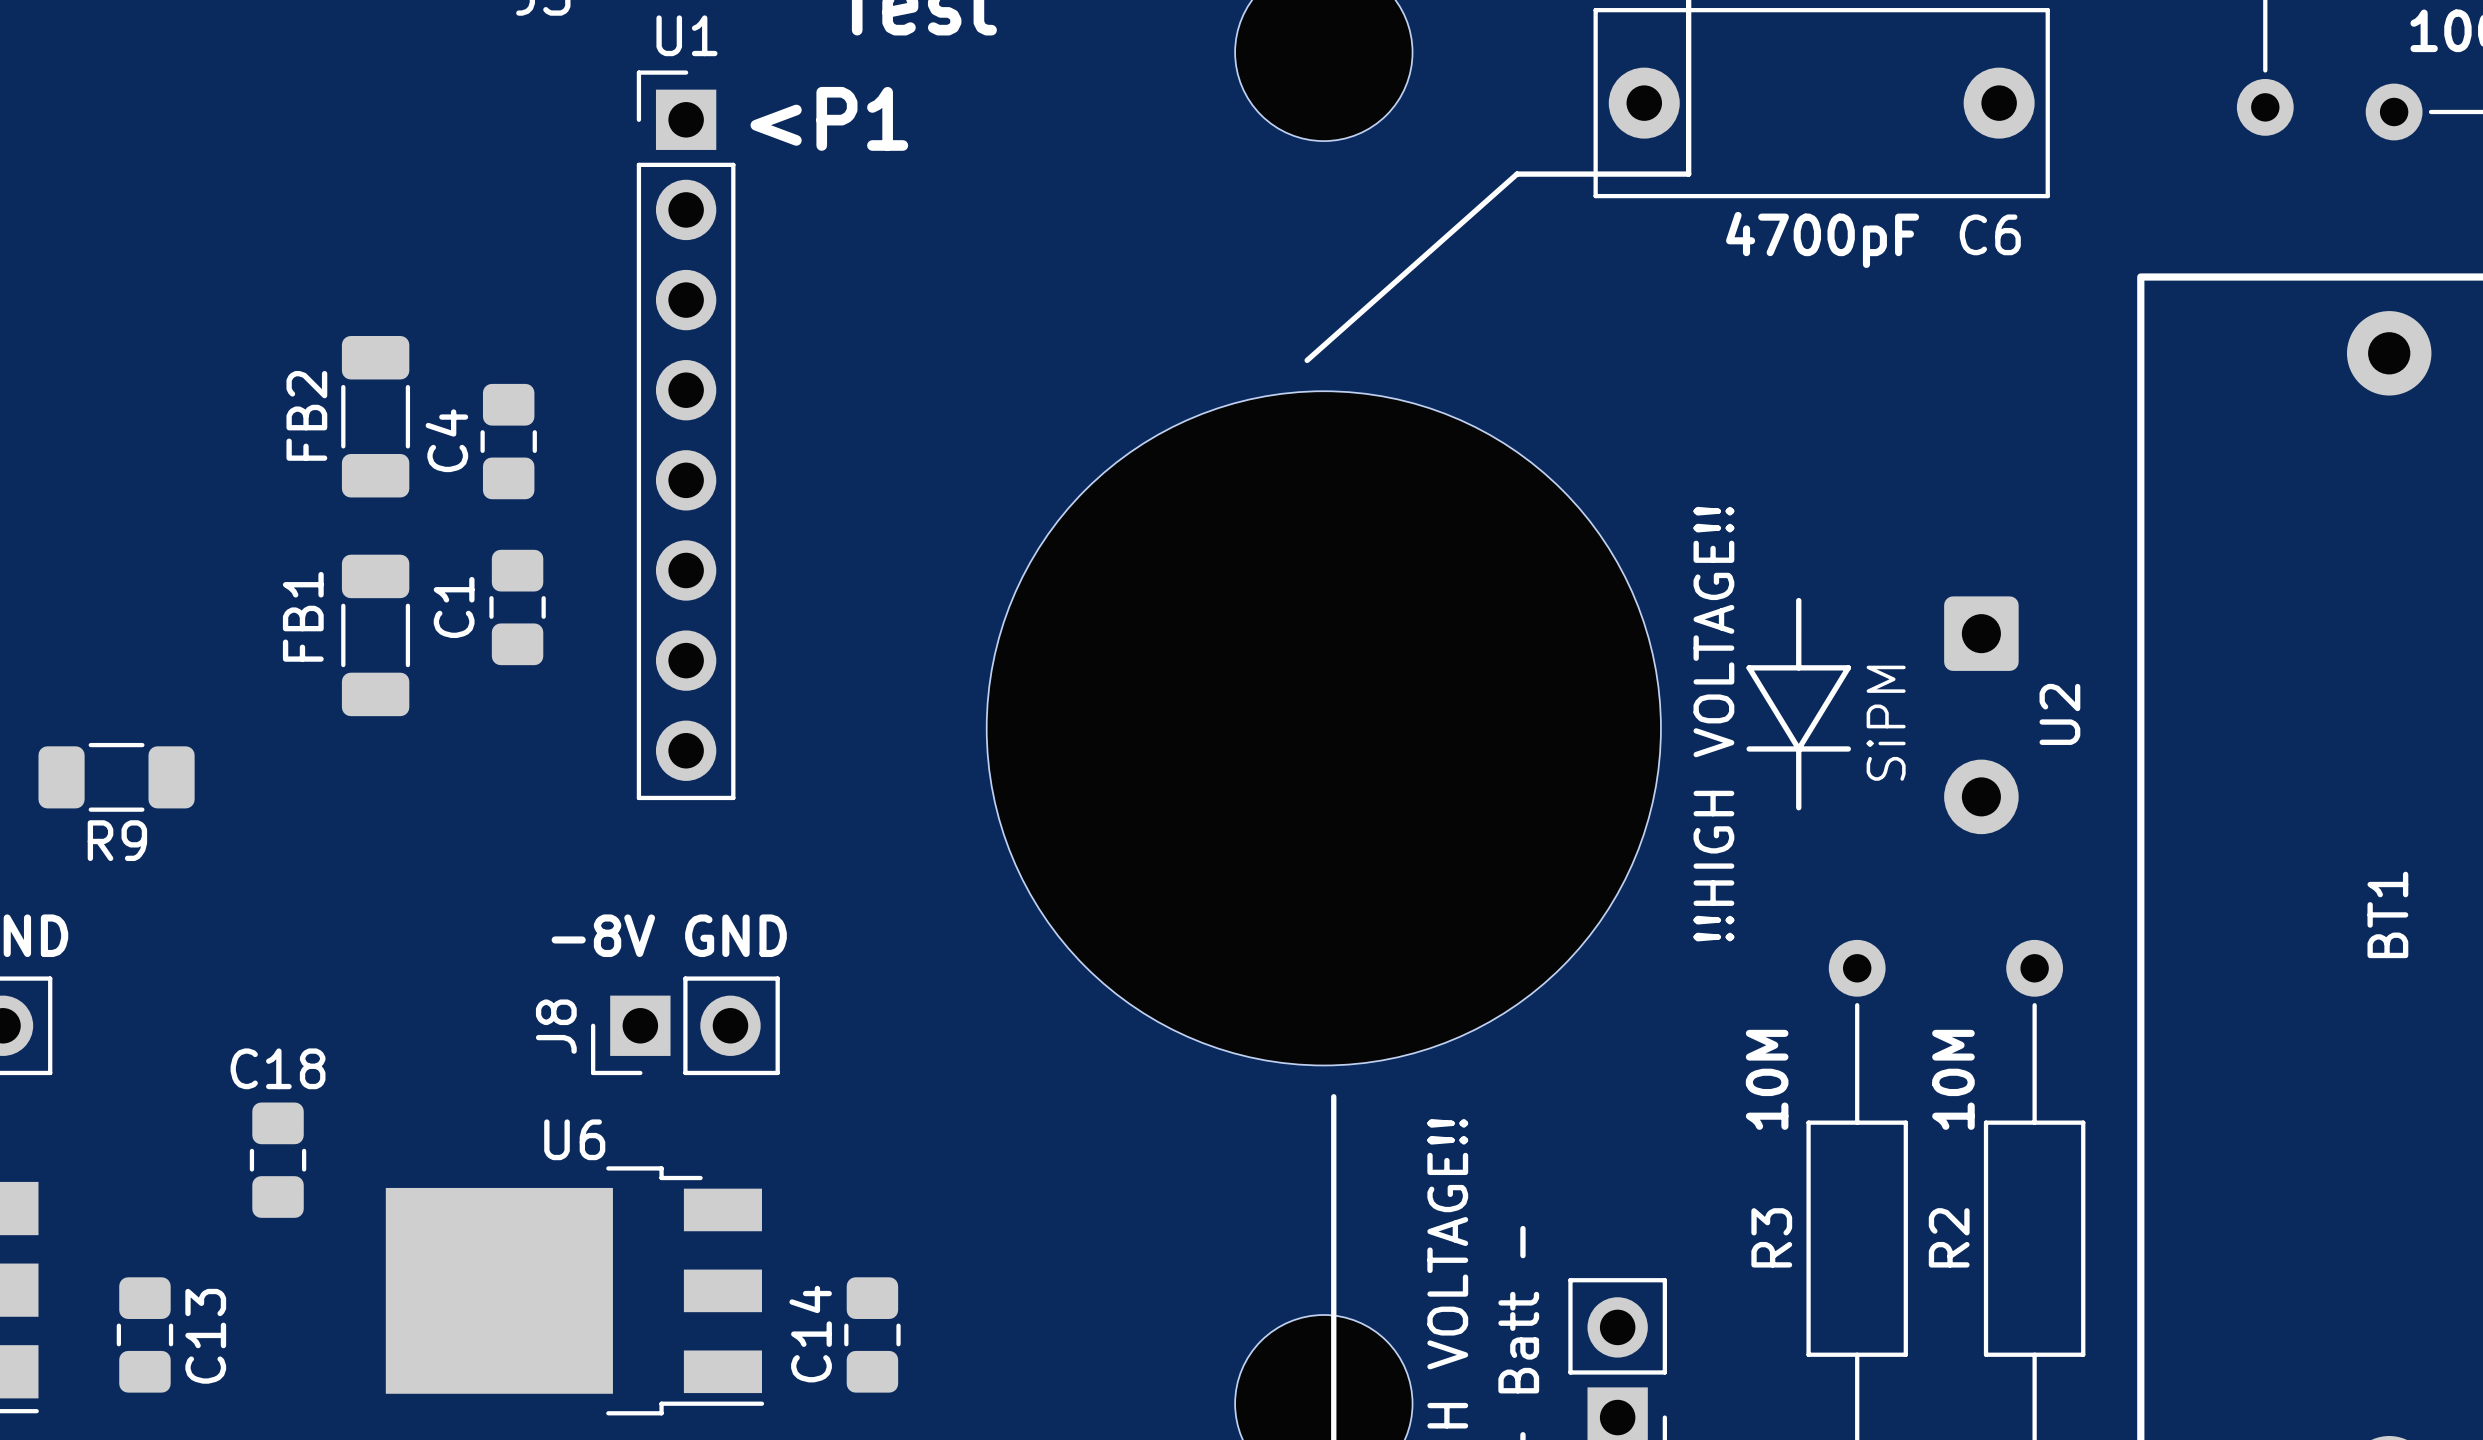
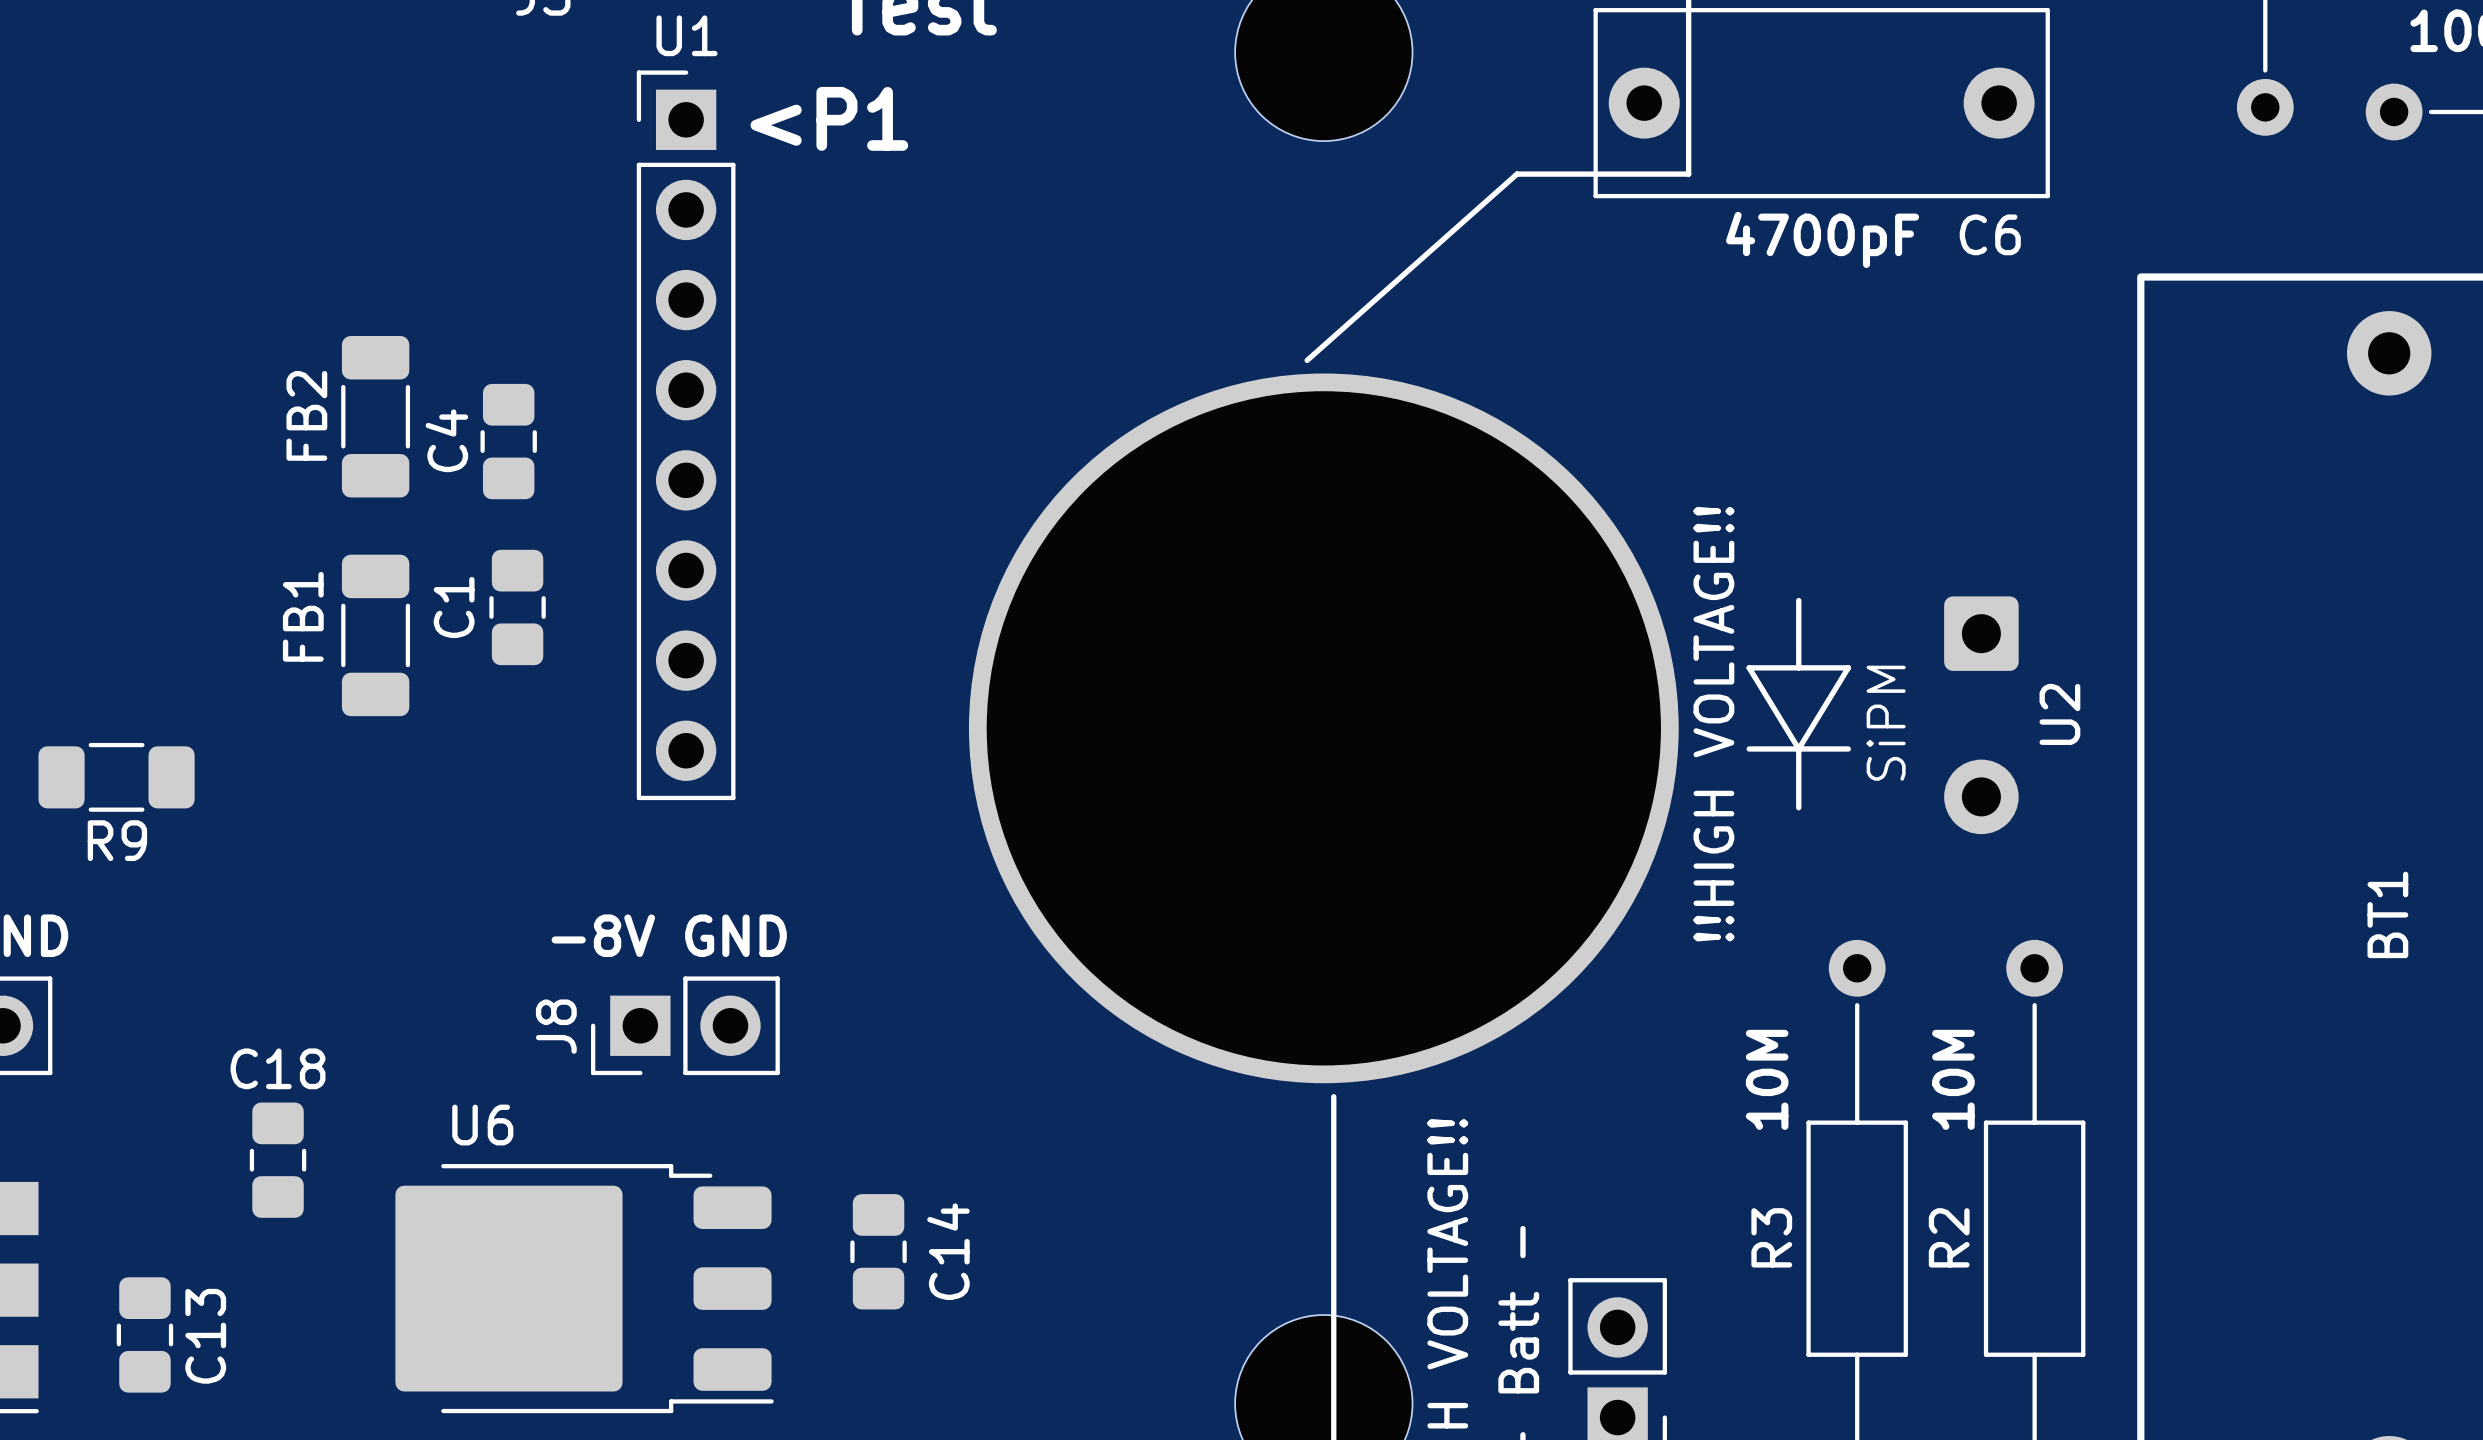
part footprint: [986, 391, 1661, 1066] -> [968, 373, 1679, 1084]
U6 name position: U6 (574, 1139) -> U6 (482, 1125)
U6 footprint: [385, 1166, 765, 1416] -> [395, 1164, 774, 1414]
C14 name position: C14 (810, 1334) -> C14 (948, 1251)
C14 position: (872, 1334) -> (878, 1251)

